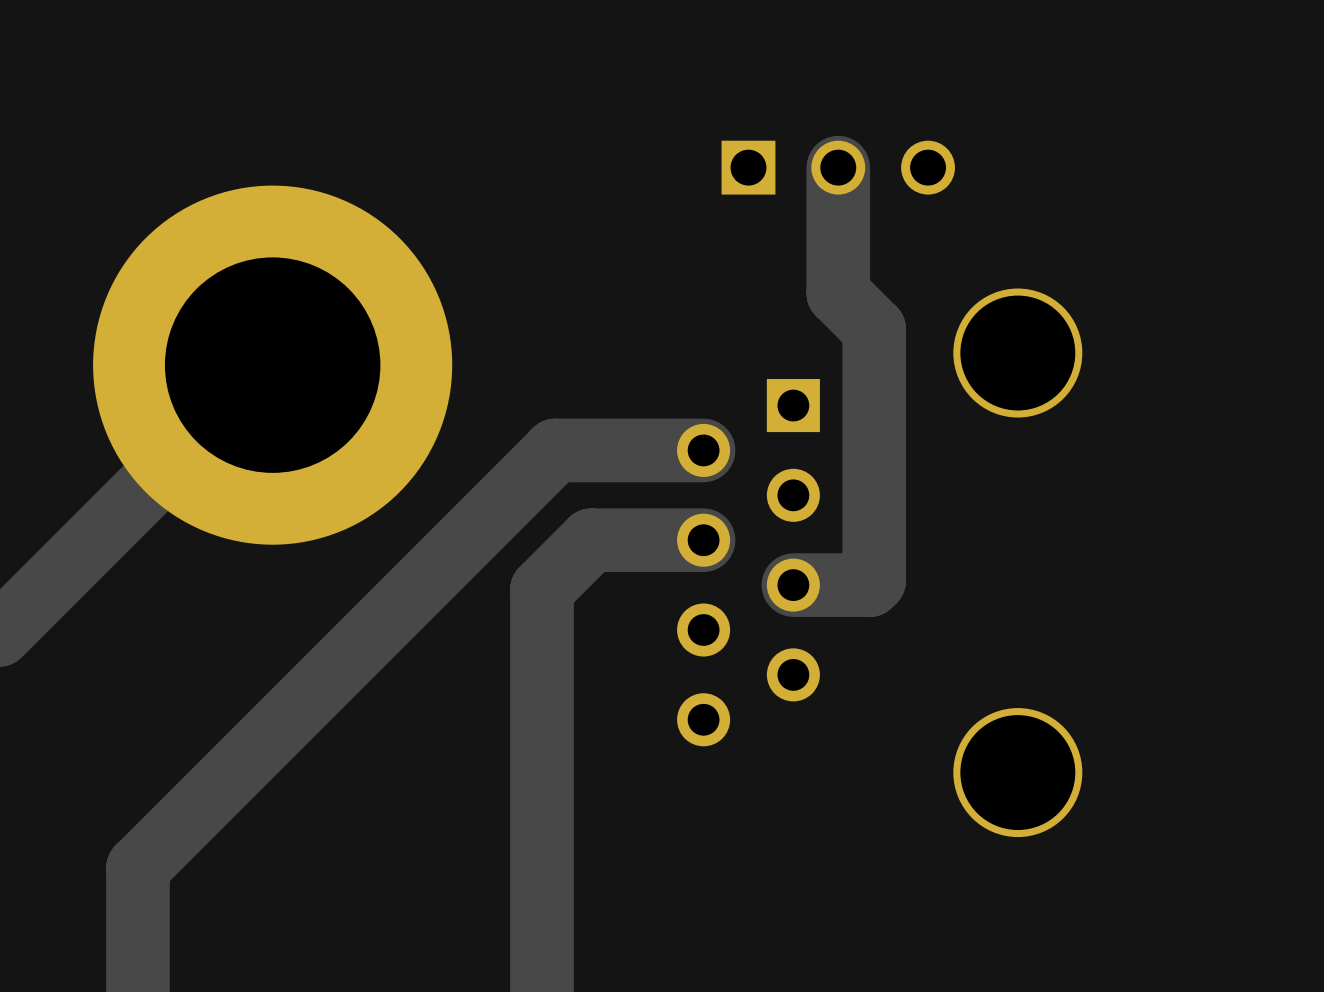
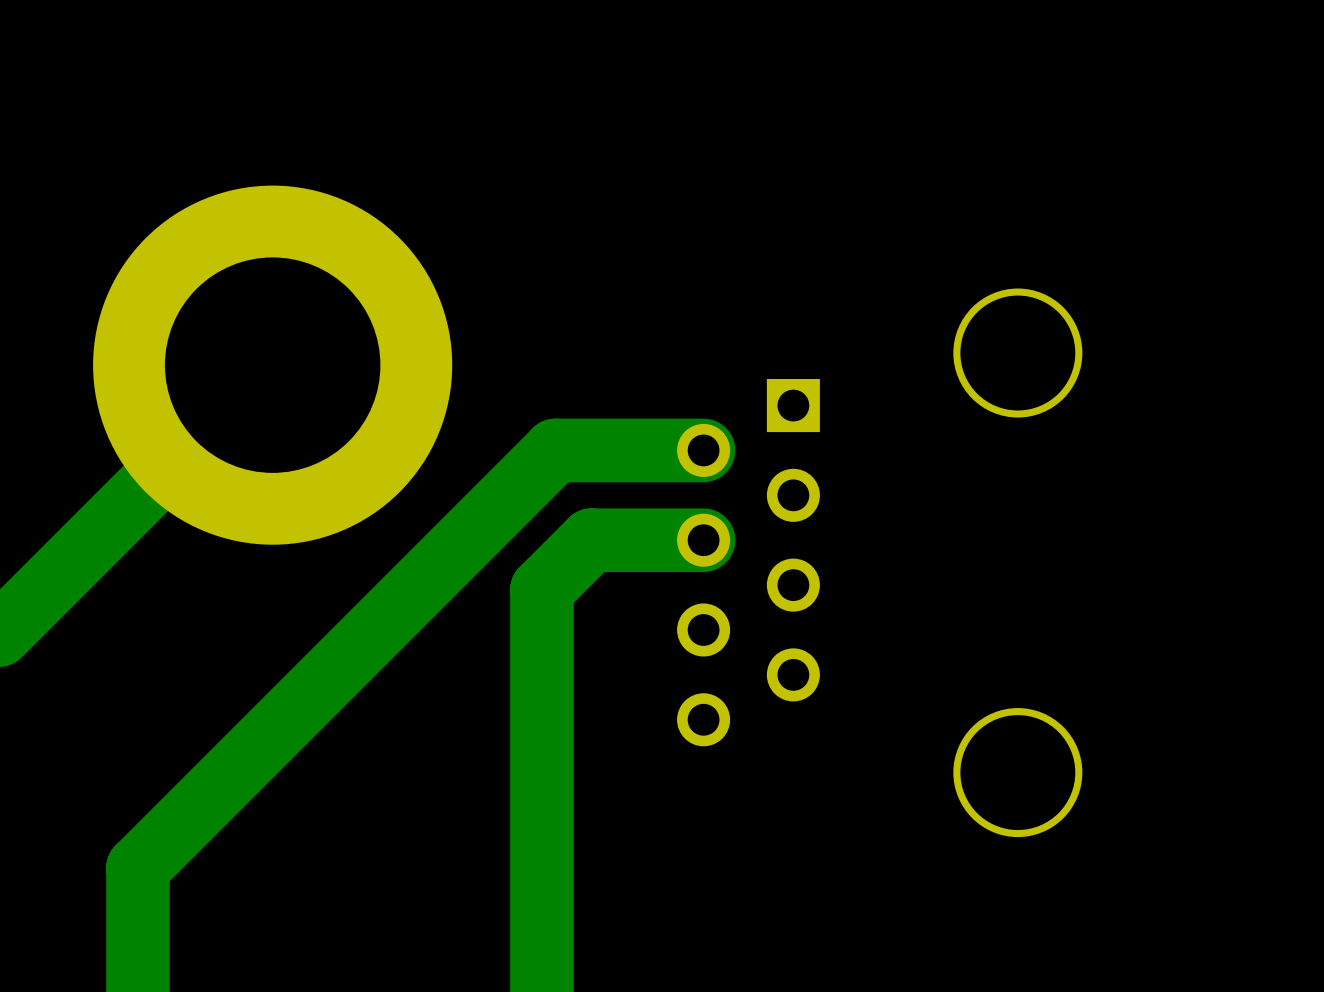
track: (838, 167) (838, 293) (874, 329) (874, 580) (869, 585) (793, 585) -> none
part: (838, 167) -> none

